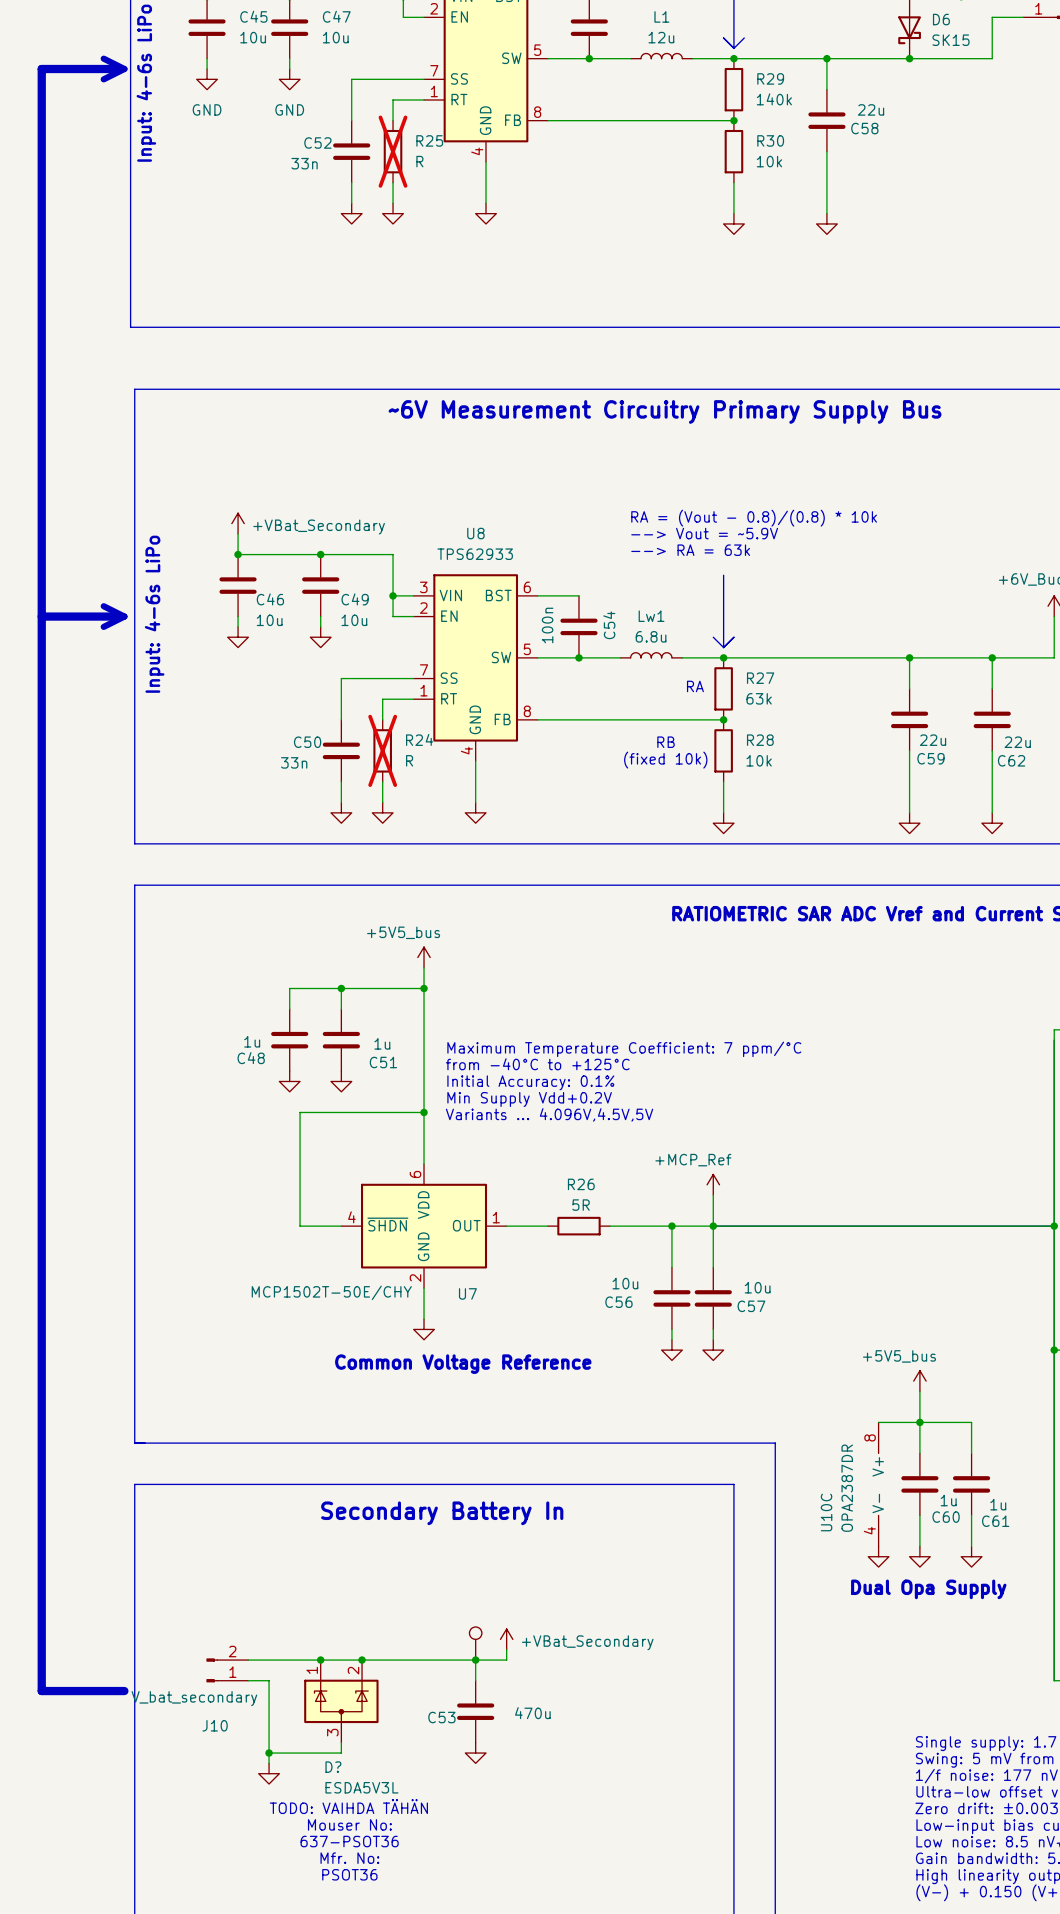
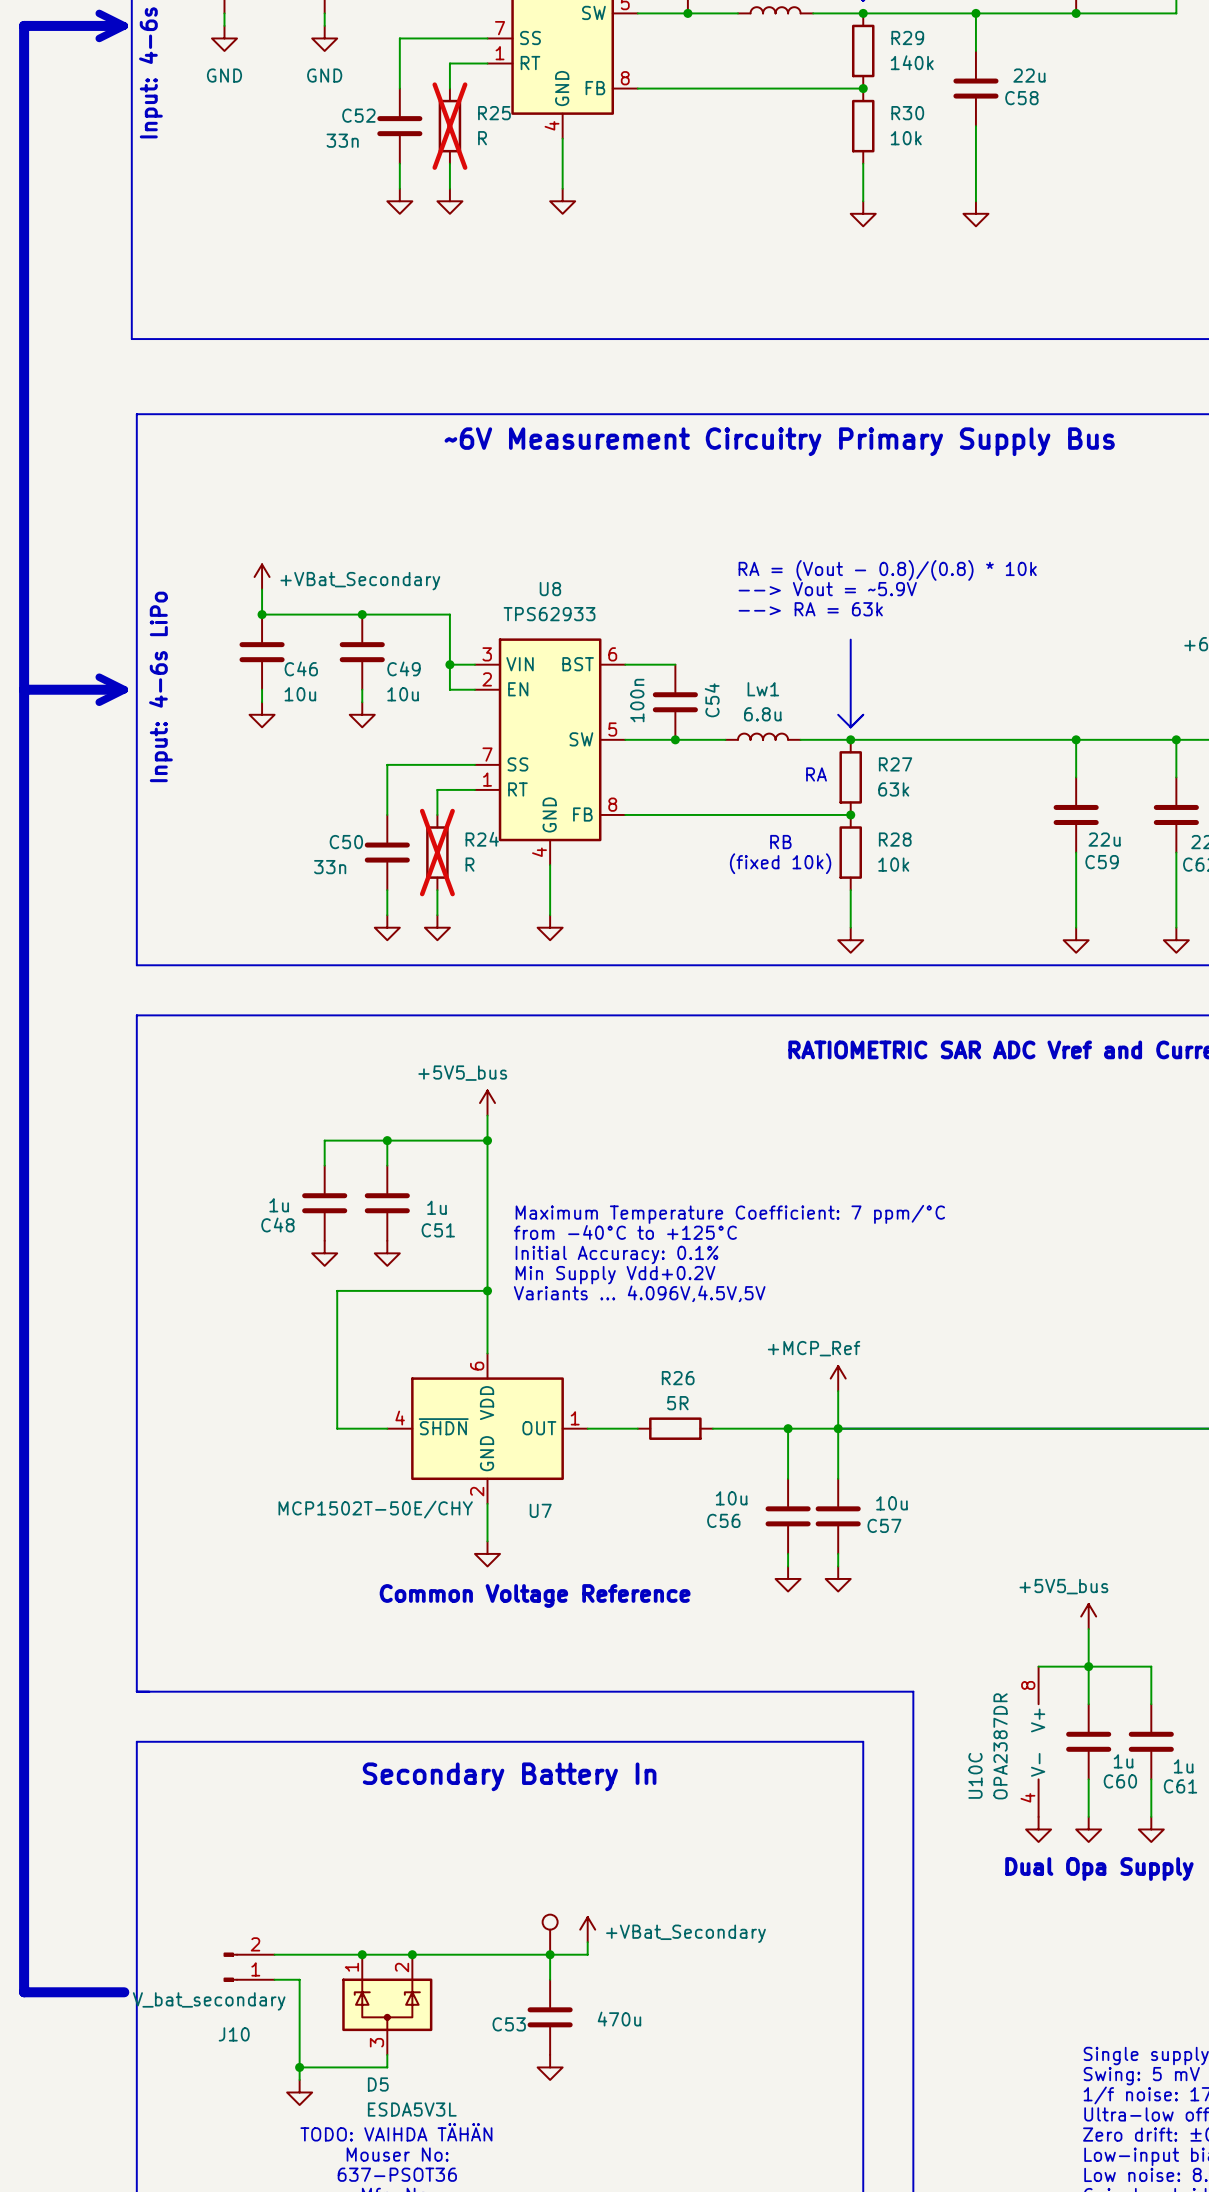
D? name: D? (333, 1767) -> D5 (378, 2084)

